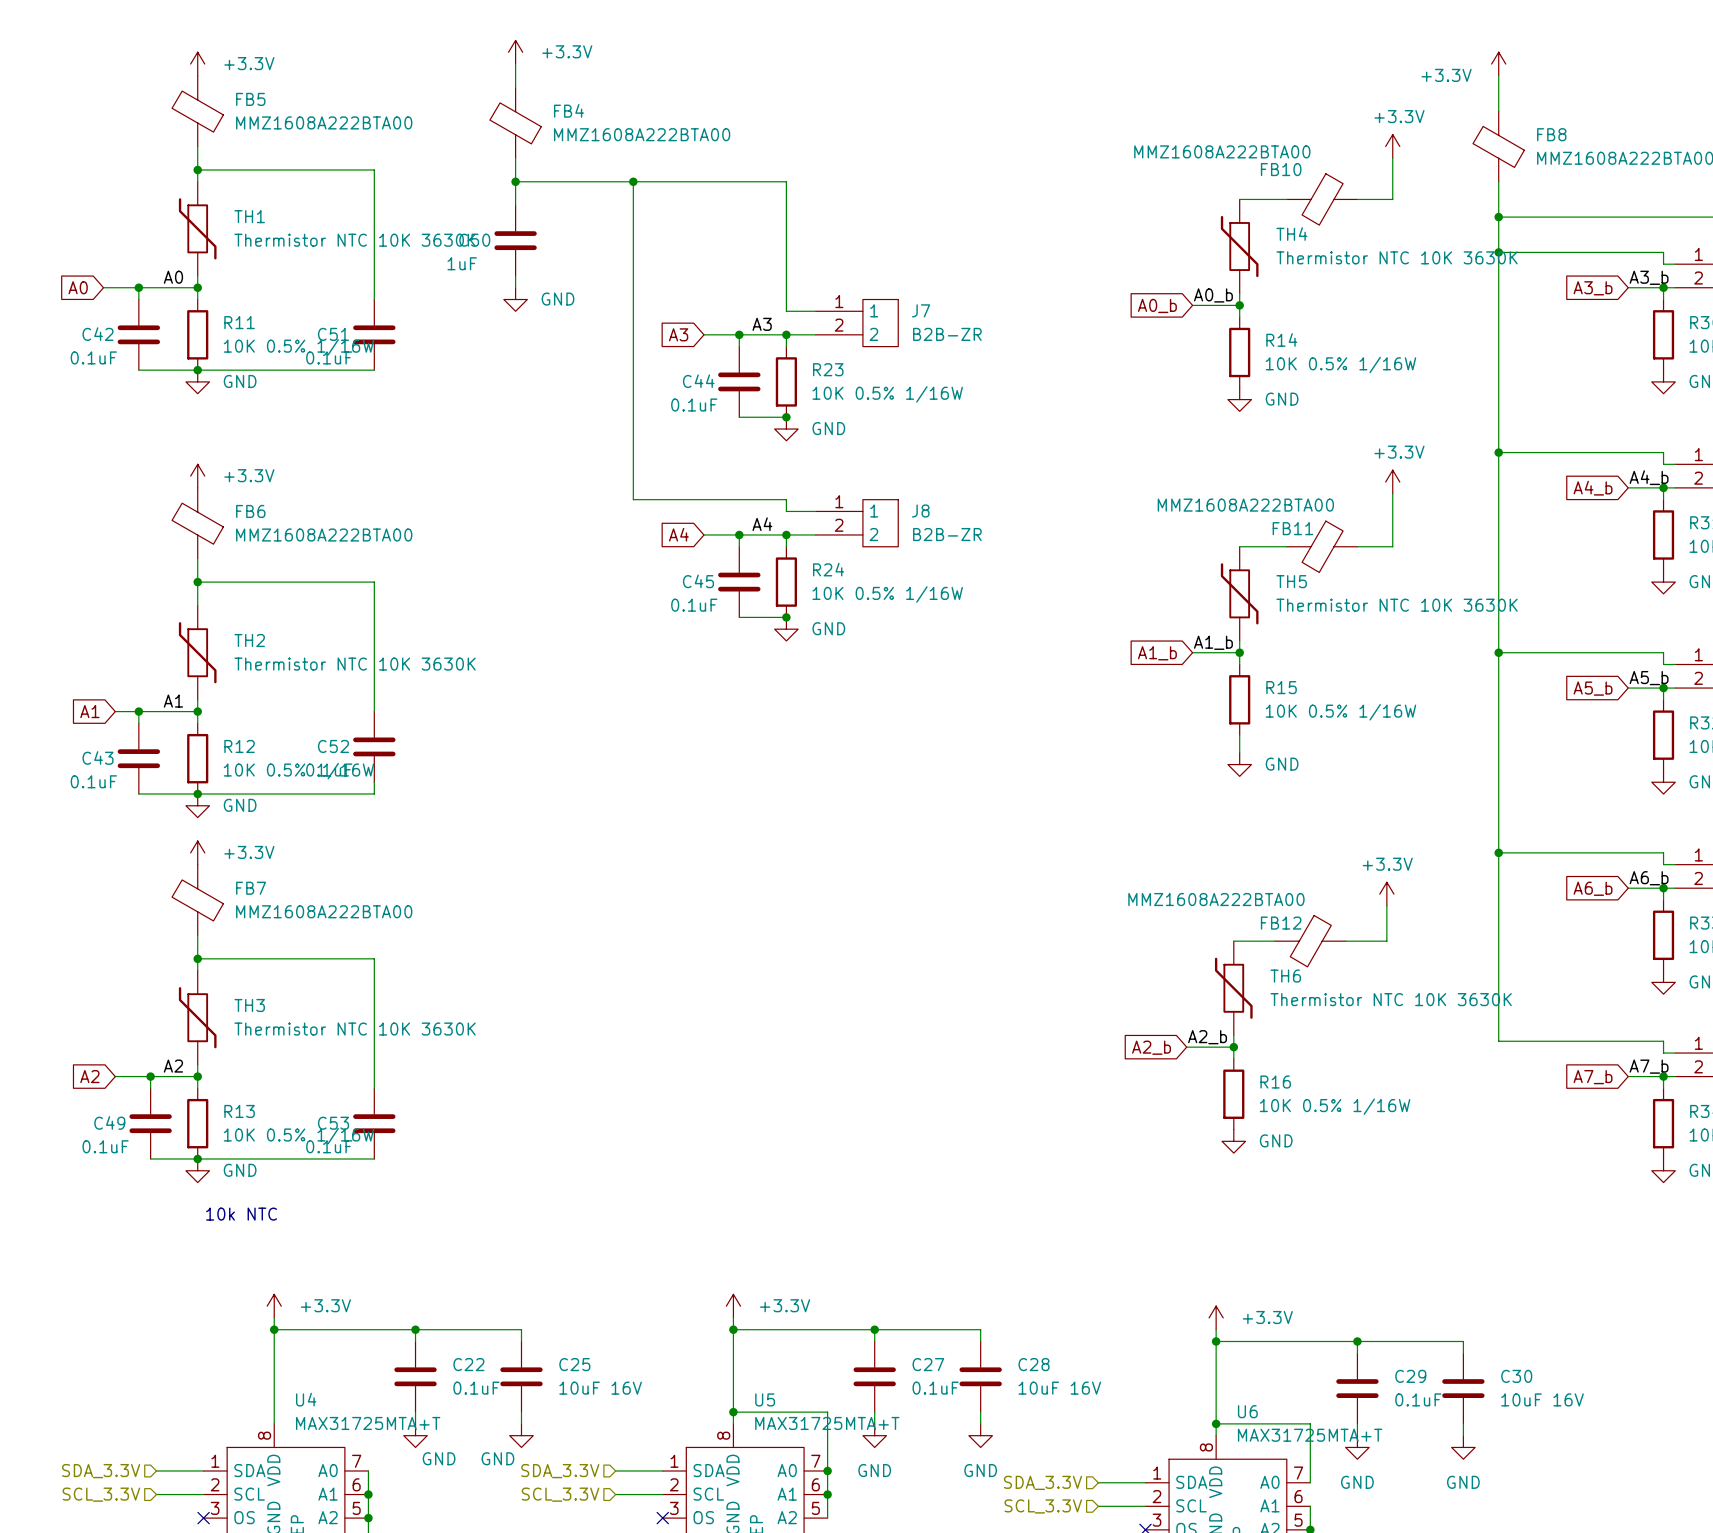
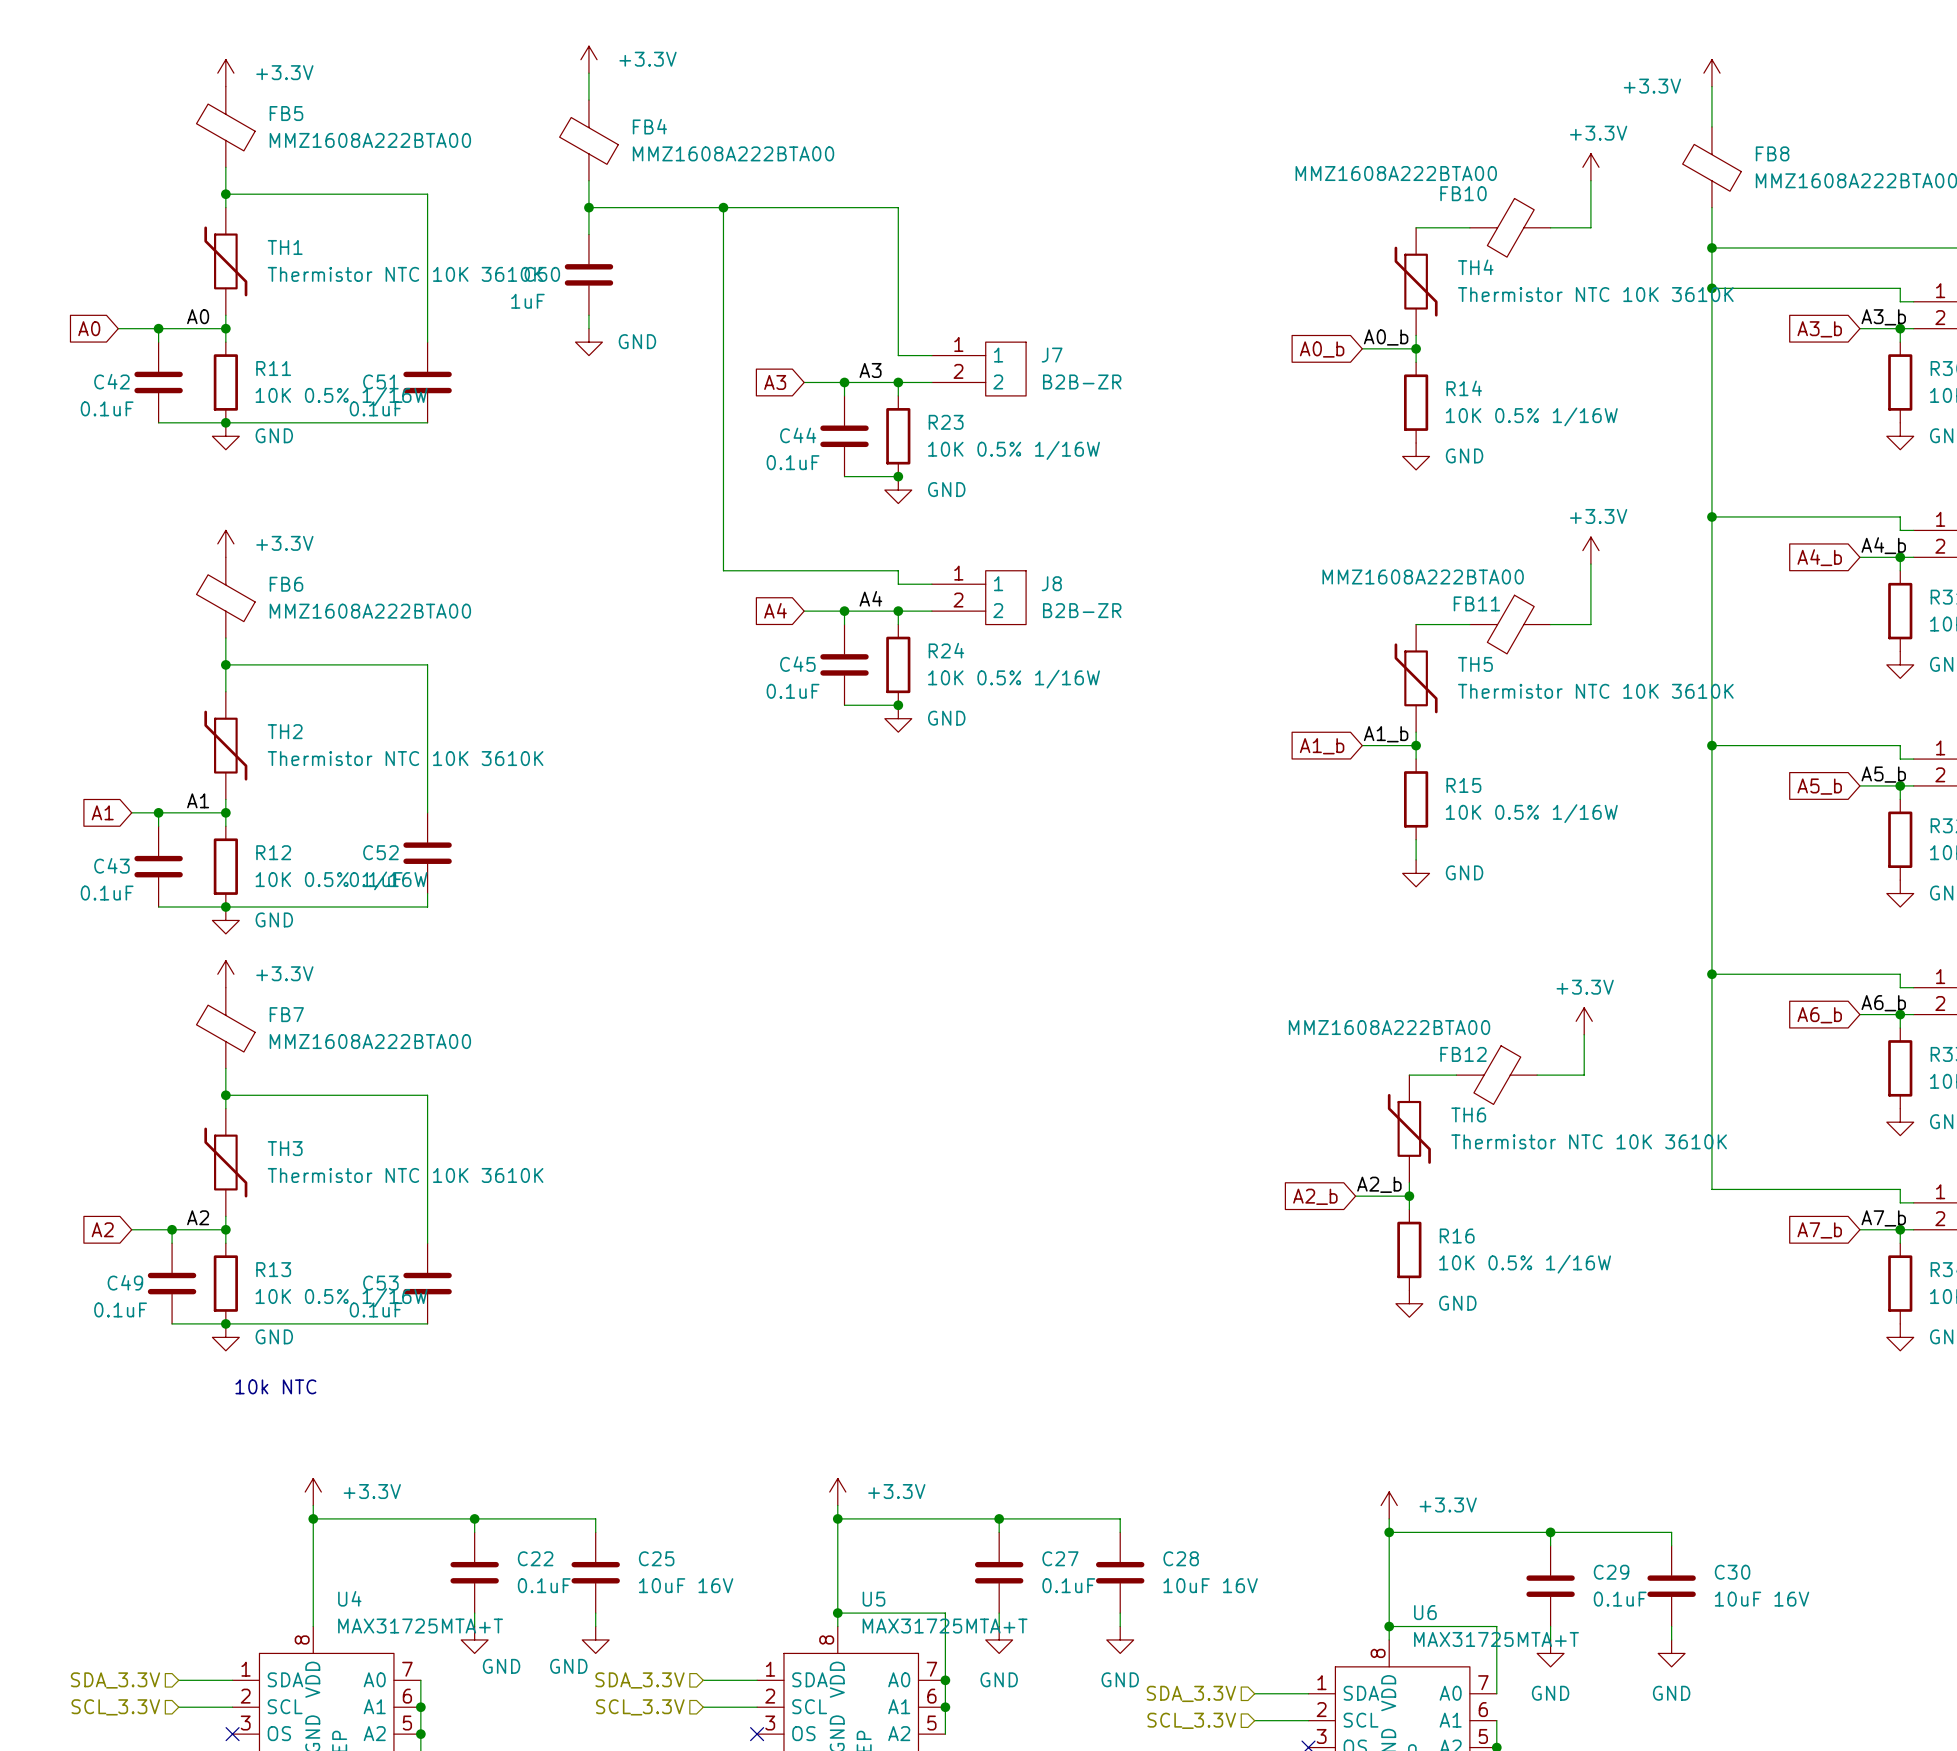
TH1 value: Thermistor NTC 10K 3630K (355, 240) -> Thermistor NTC 10K 3610K (405, 274)
TH4 value: Thermistor NTC 10K 3630K (1397, 257) -> Thermistor NTC 10K 3610K (1595, 294)
TH5 value: Thermistor NTC 10K 3630K (1397, 605) -> Thermistor NTC 10K 3610K (1595, 691)
TH2 value: Thermistor NTC 10K 3630K (355, 664) -> Thermistor NTC 10K 3610K (405, 758)
TH6 value: Thermistor NTC 10K 3630K (1391, 999) -> Thermistor NTC 10K 3610K (1589, 1141)
TH3 value: Thermistor NTC 10K 3630K (355, 1029) -> Thermistor NTC 10K 3610K (405, 1175)

